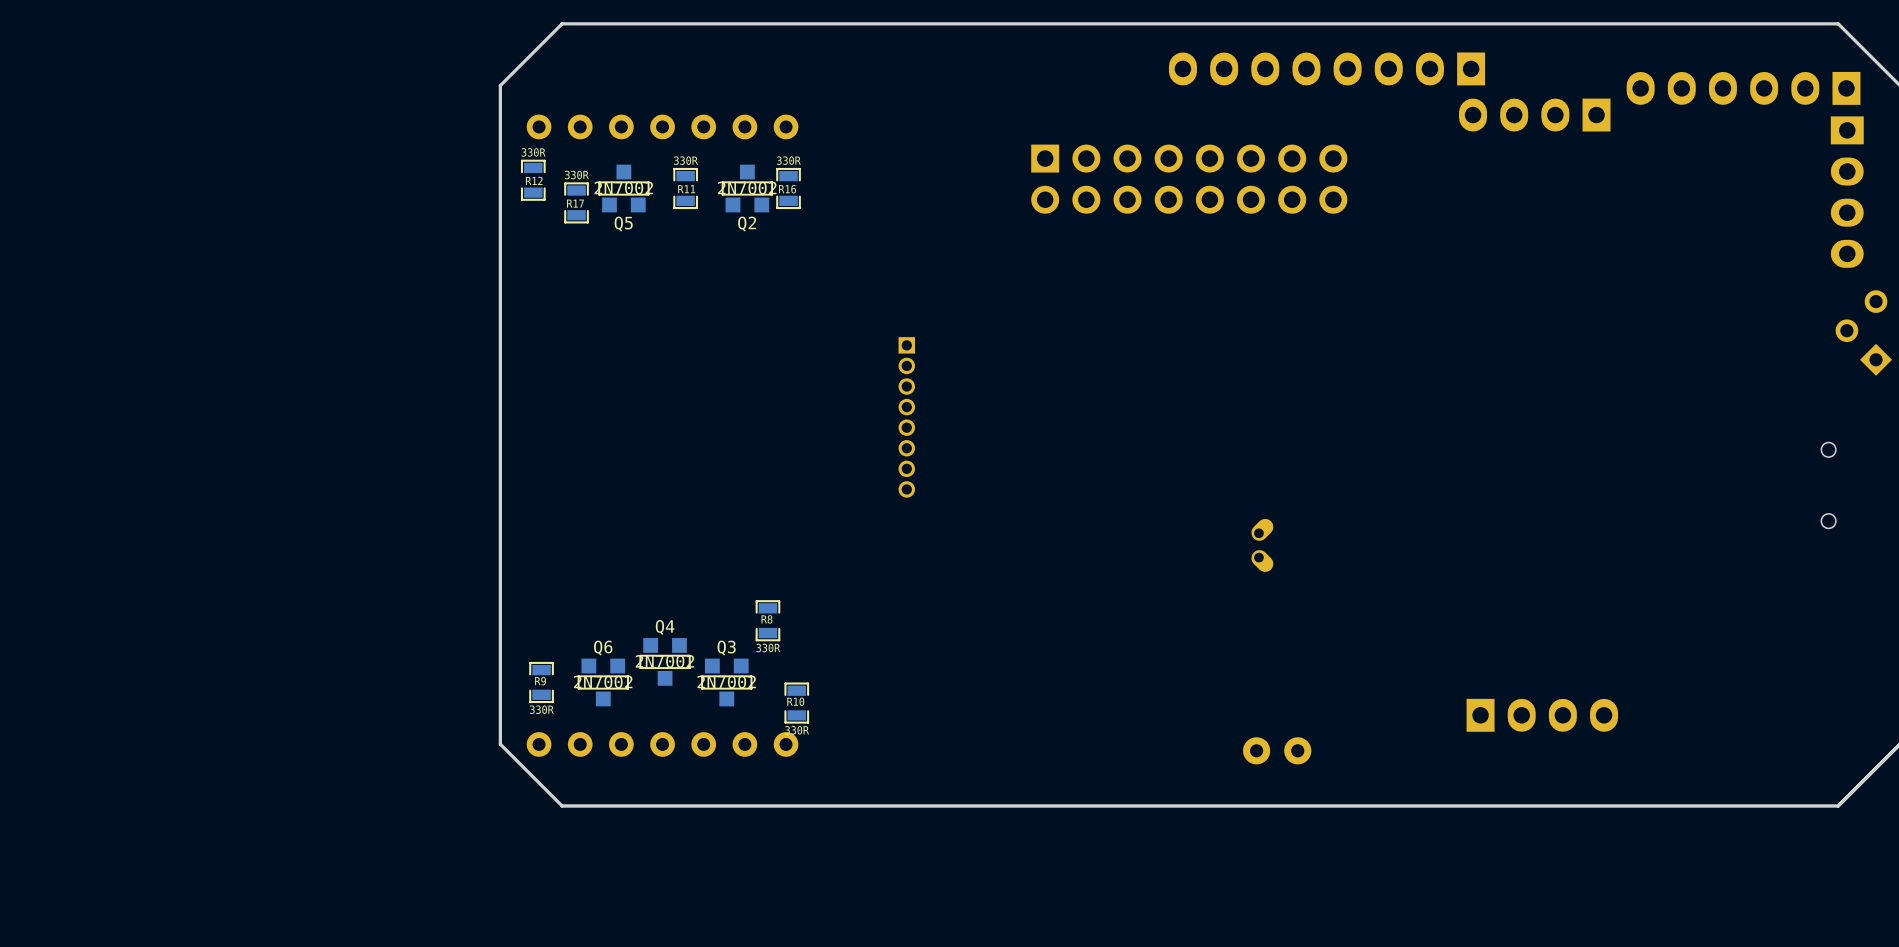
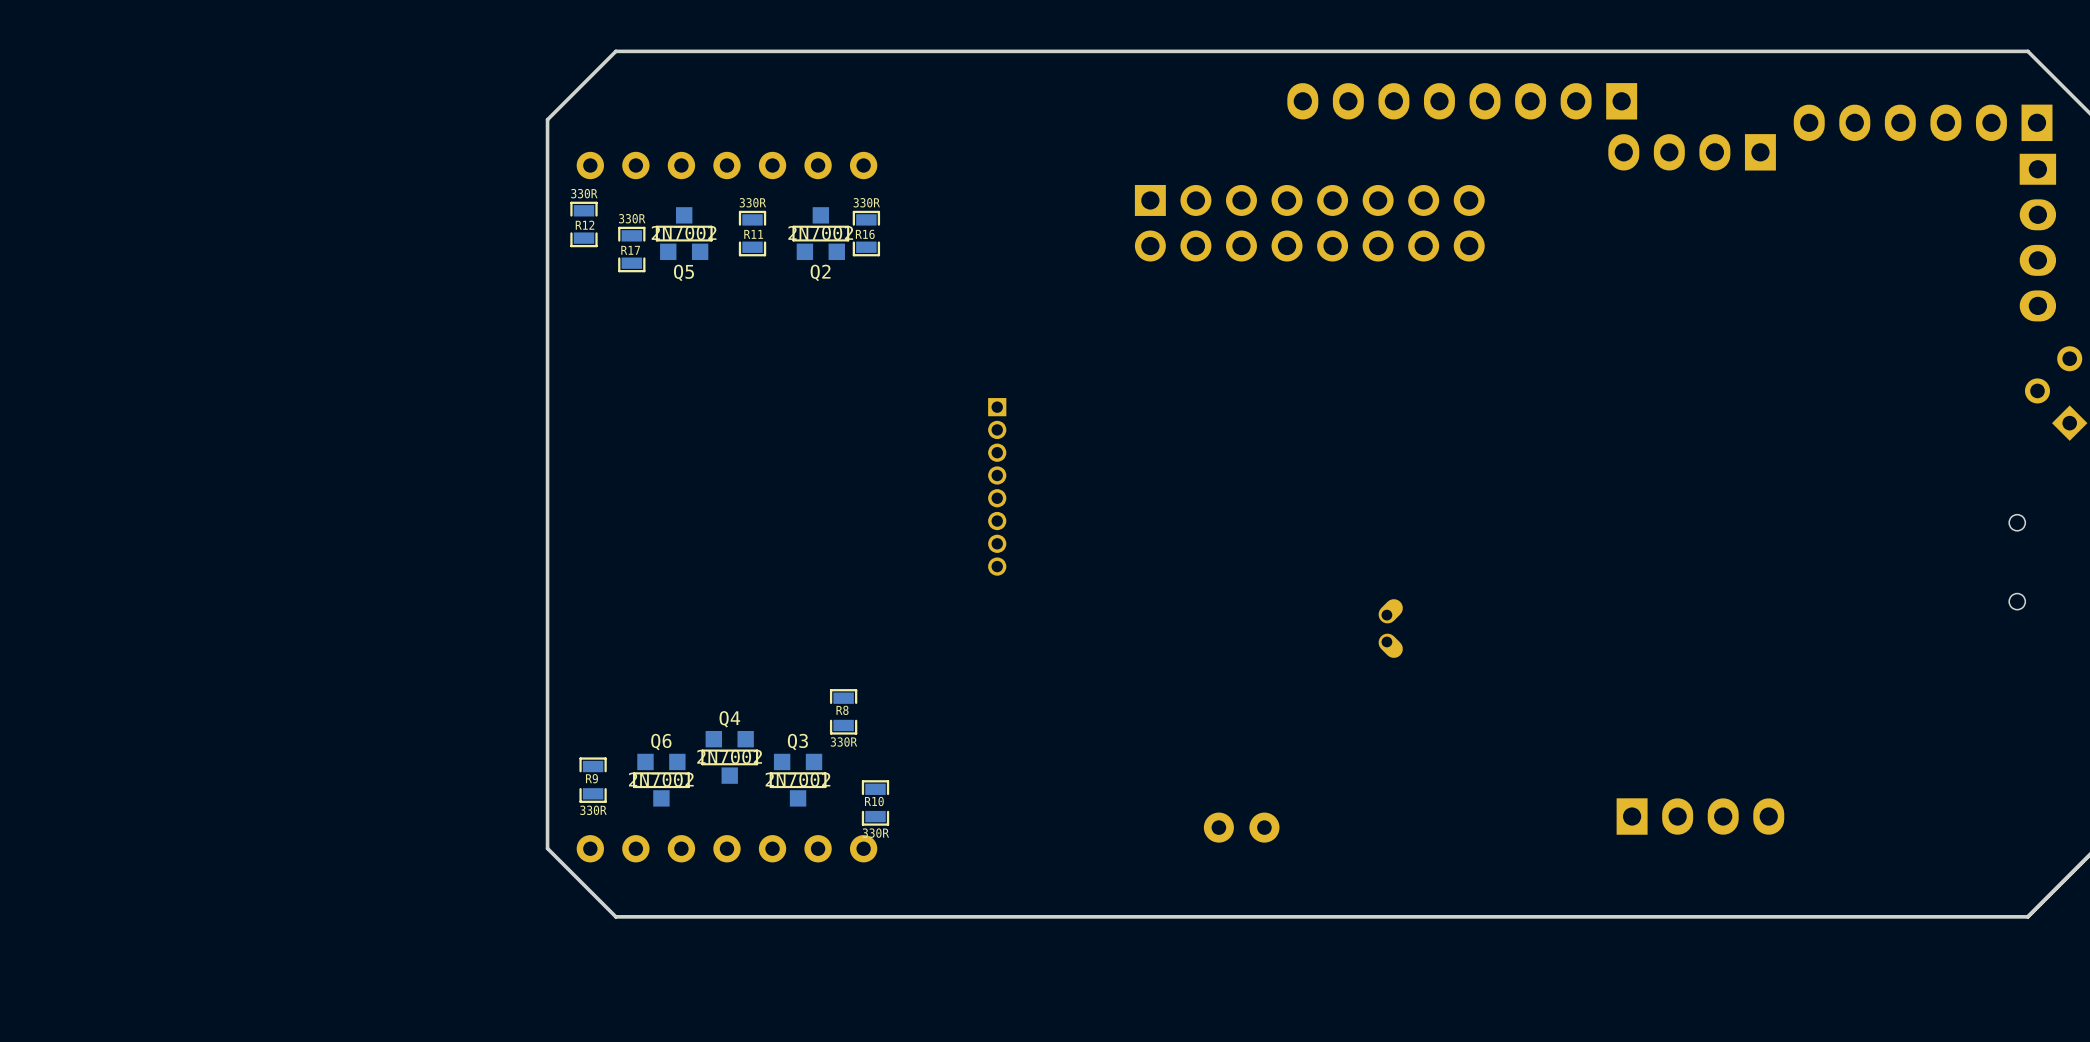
part position: (1277, 750) -> (1241, 827)

